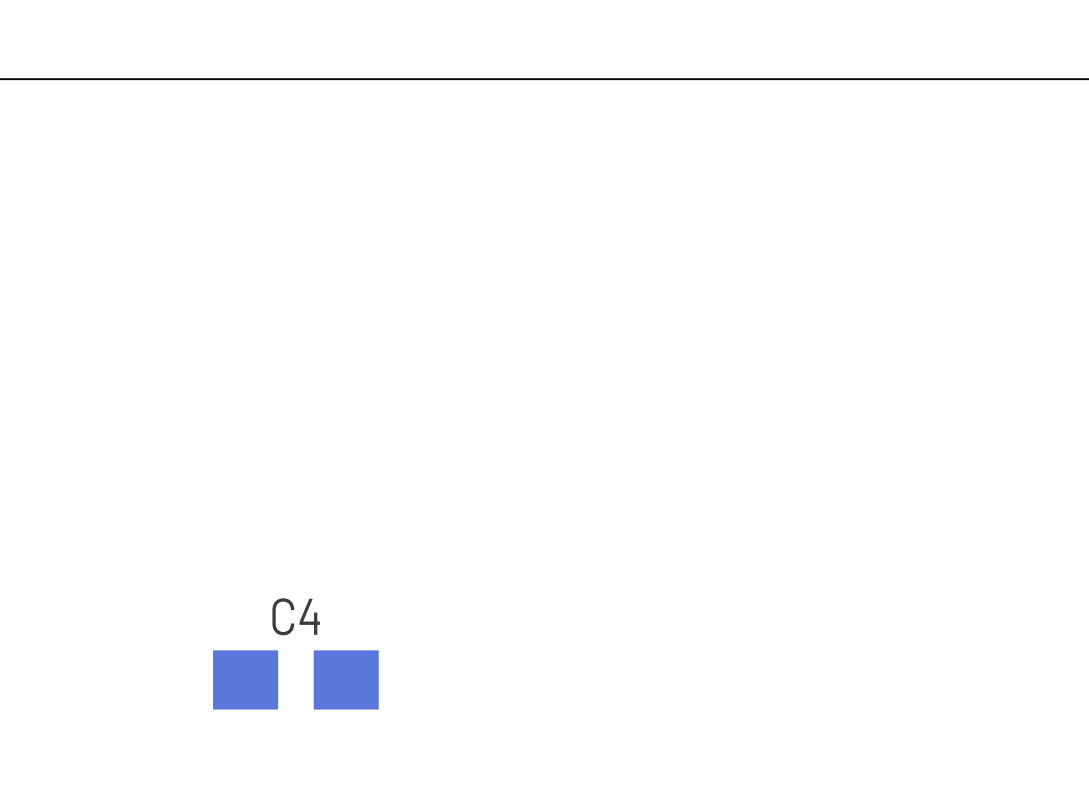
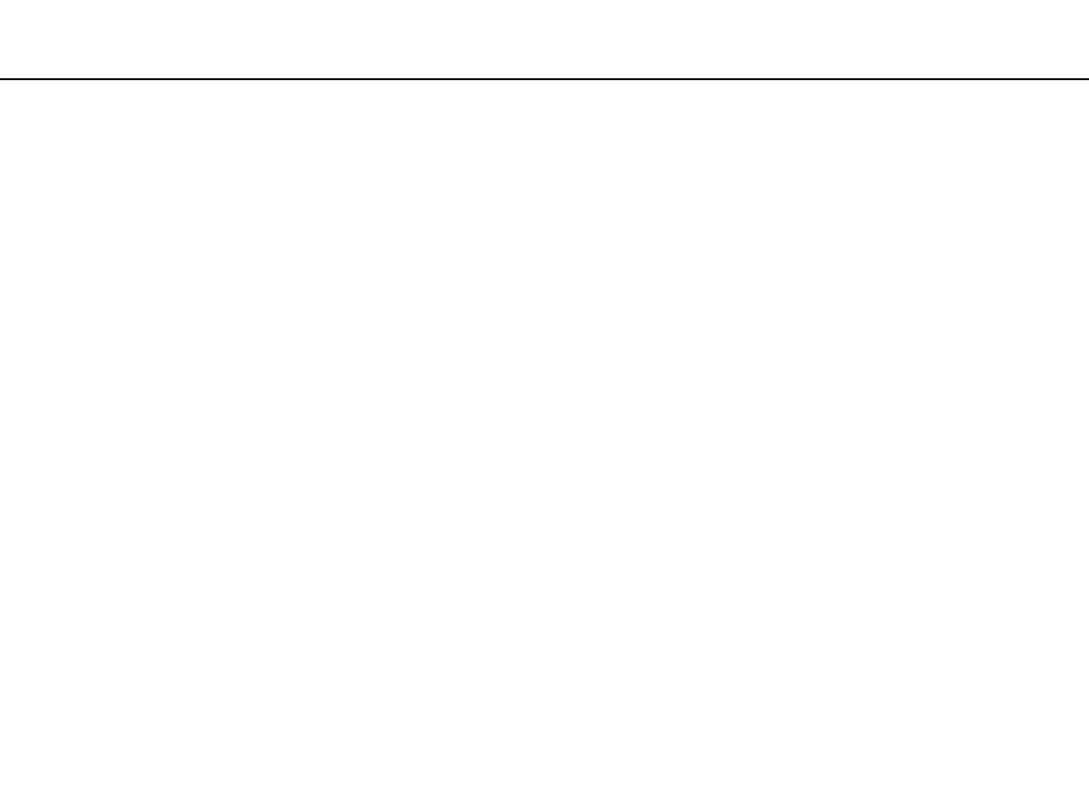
C4: (295, 679) -> none

